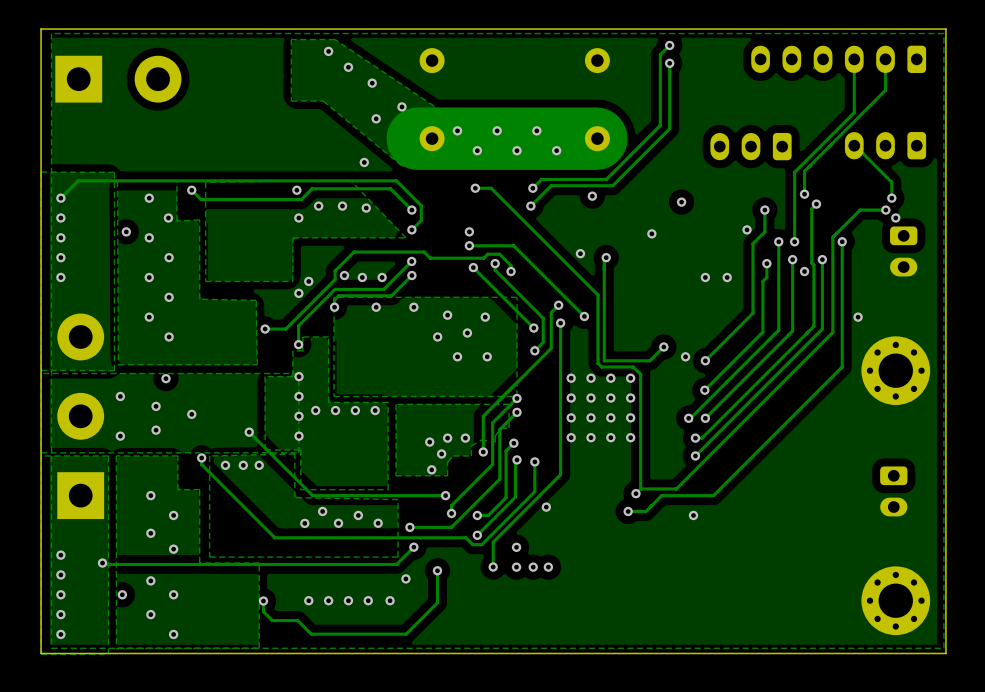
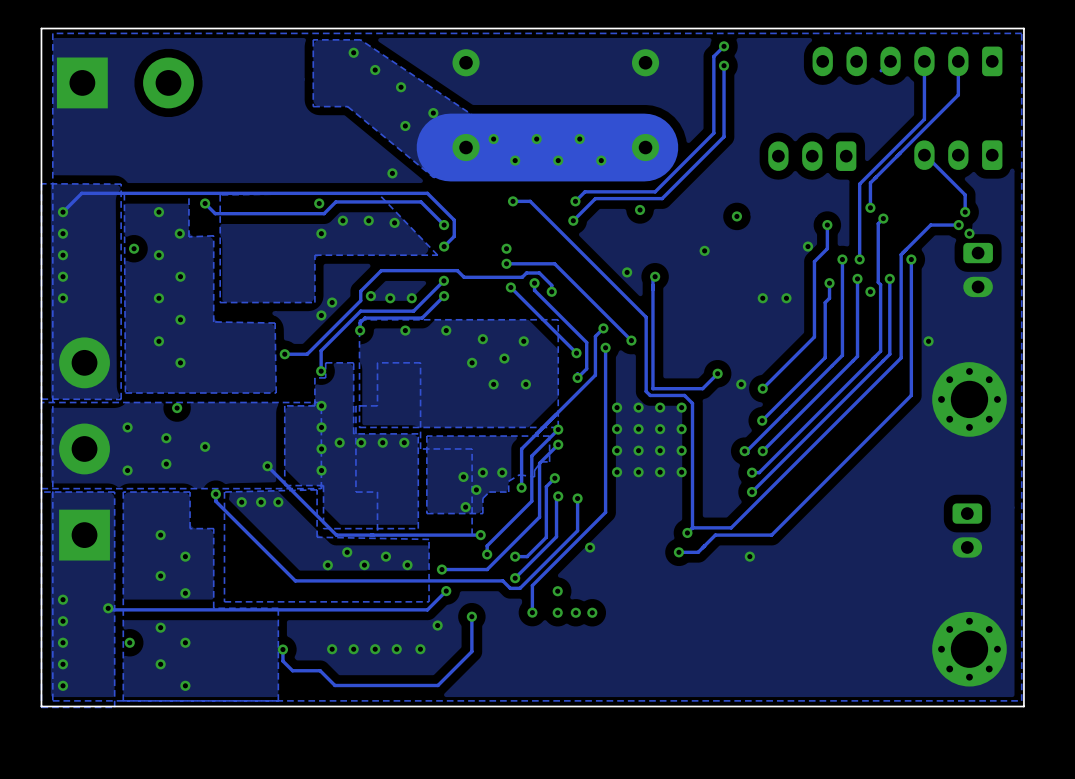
zone outline: none -> (420, 362) (420, 448) (472, 448) (472, 535) (377, 535) (377, 492) (355, 492) (355, 405) (377, 405) (377, 362) (420, 362)

